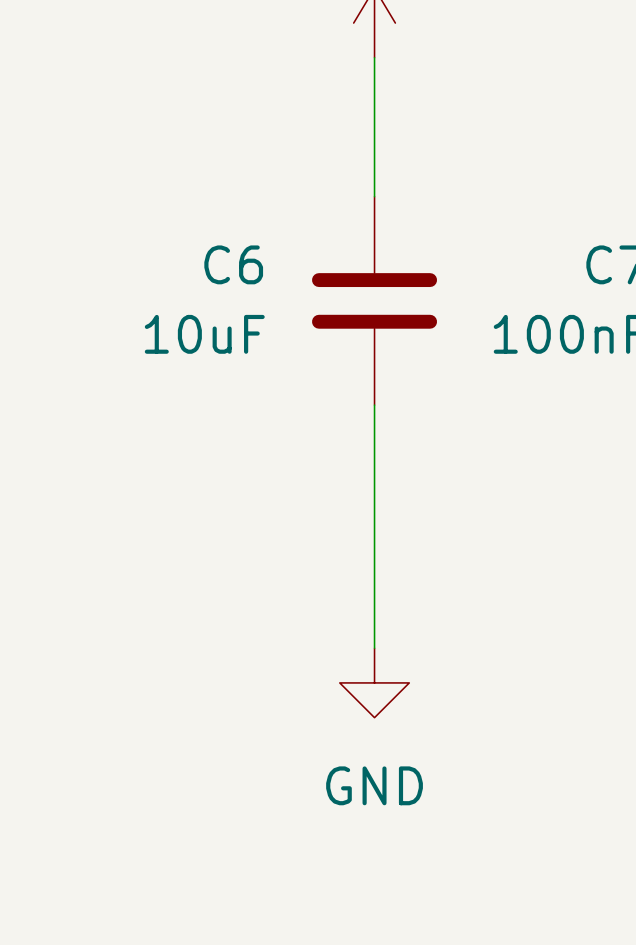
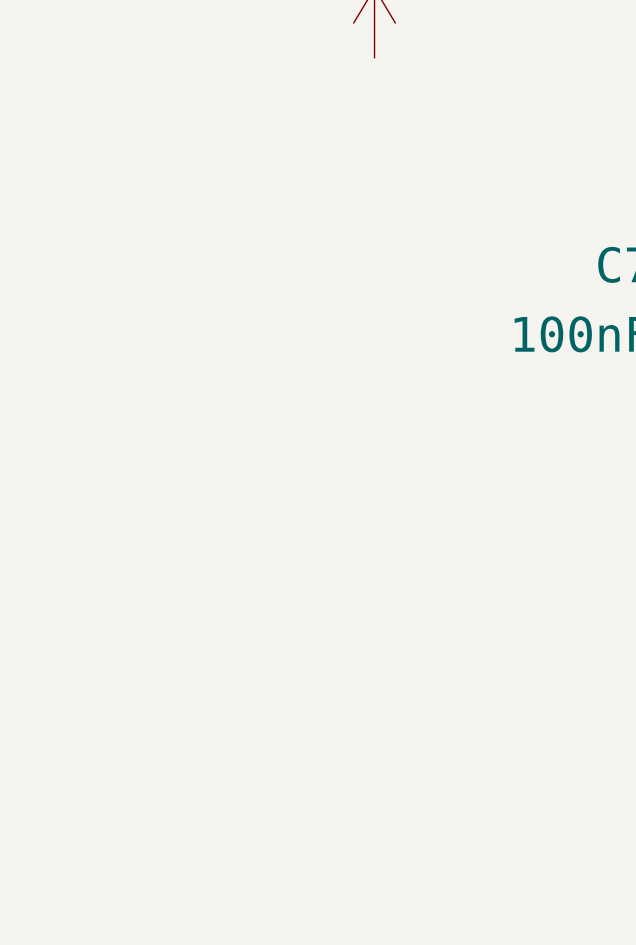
wire: (374, 57) (374, 196) -> none
C6: 10uF (374, 300) -> none
wire: (374, 405) (374, 648) -> none
power symbol: GND (374, 682) -> none

